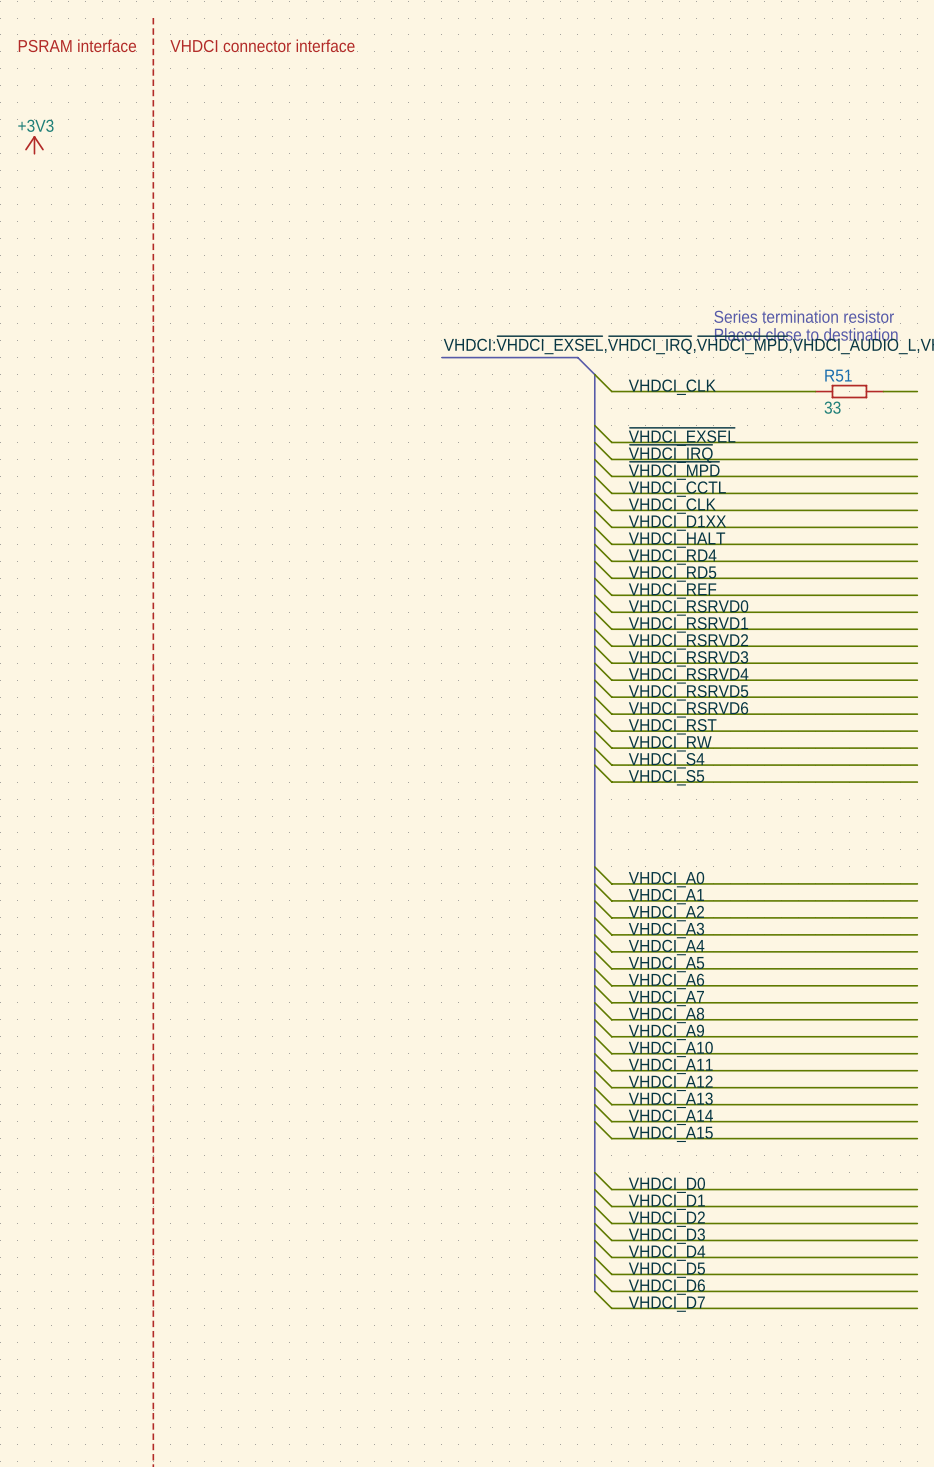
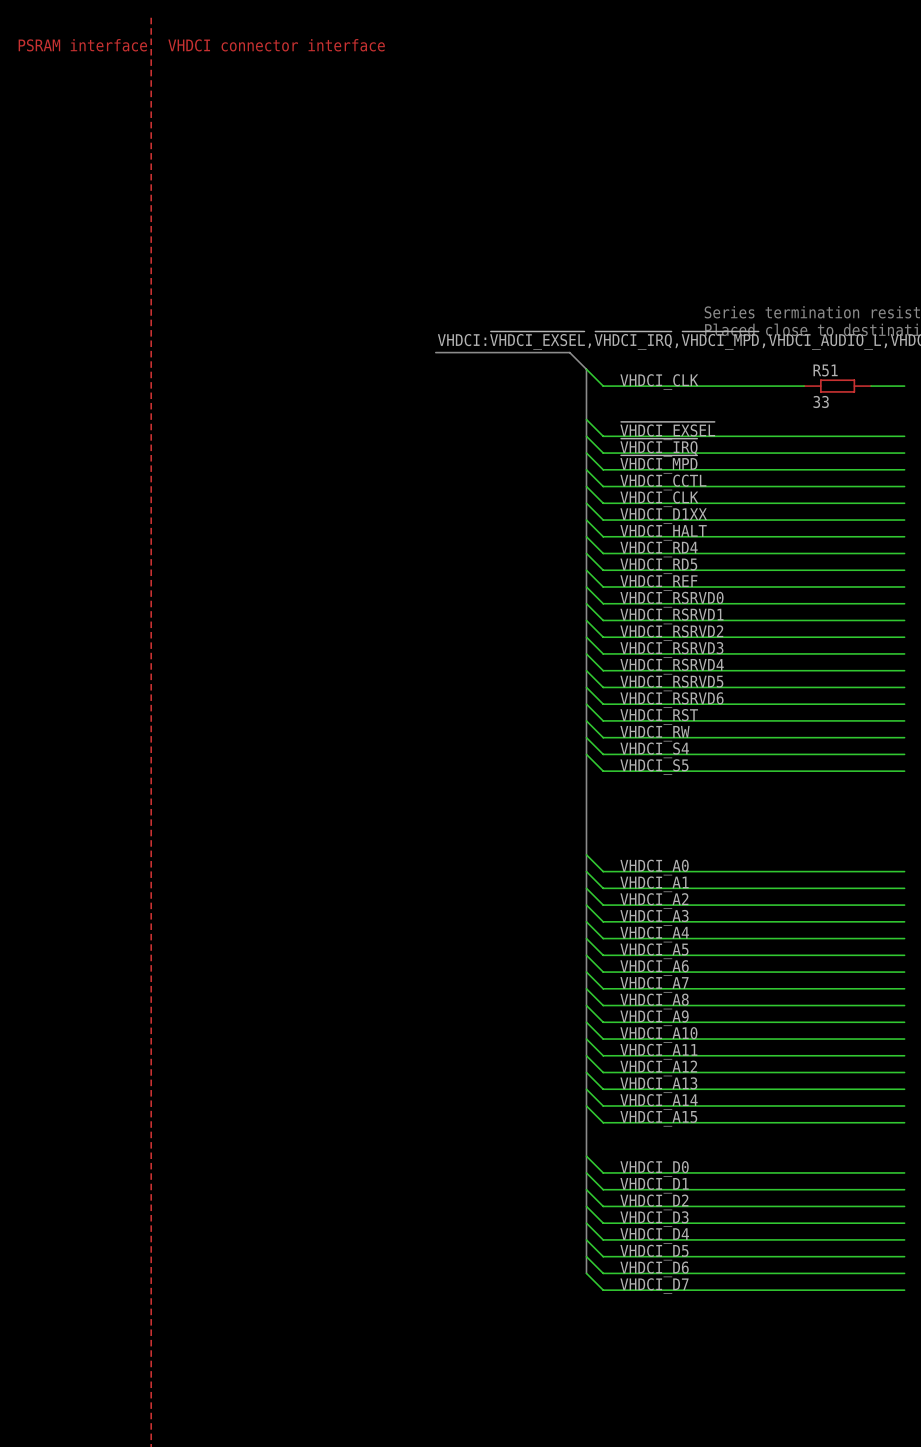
power symbol: +3V3 (34, 144) -> none

